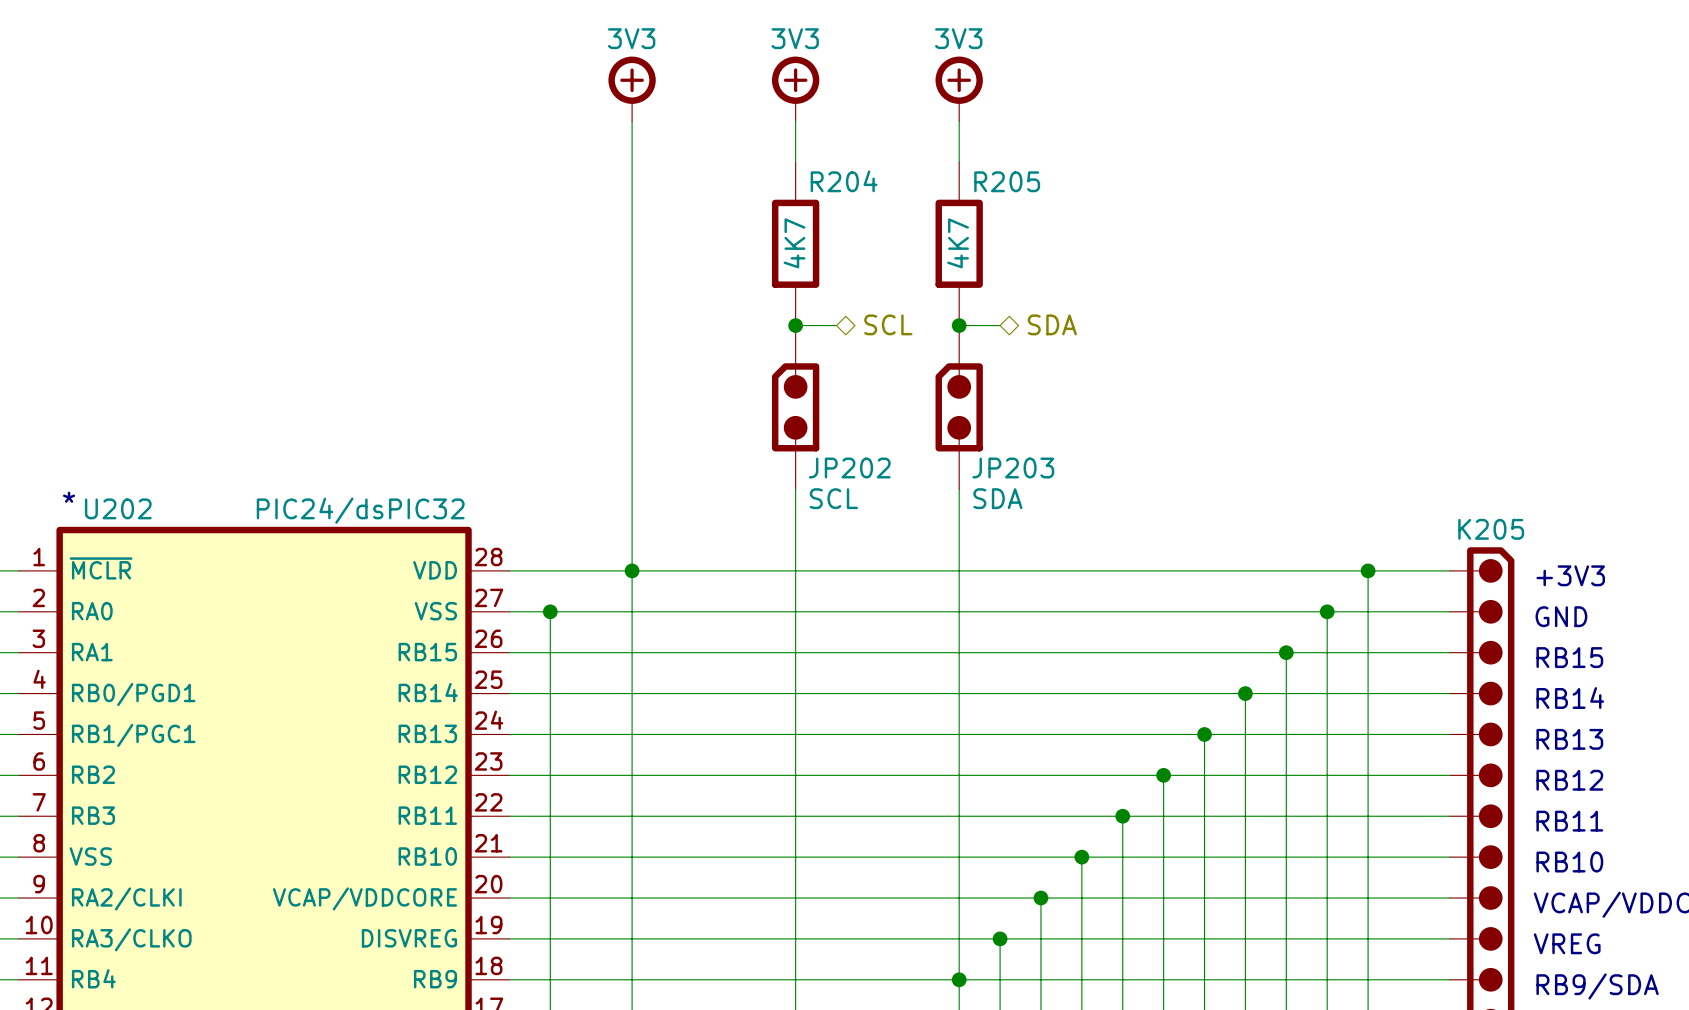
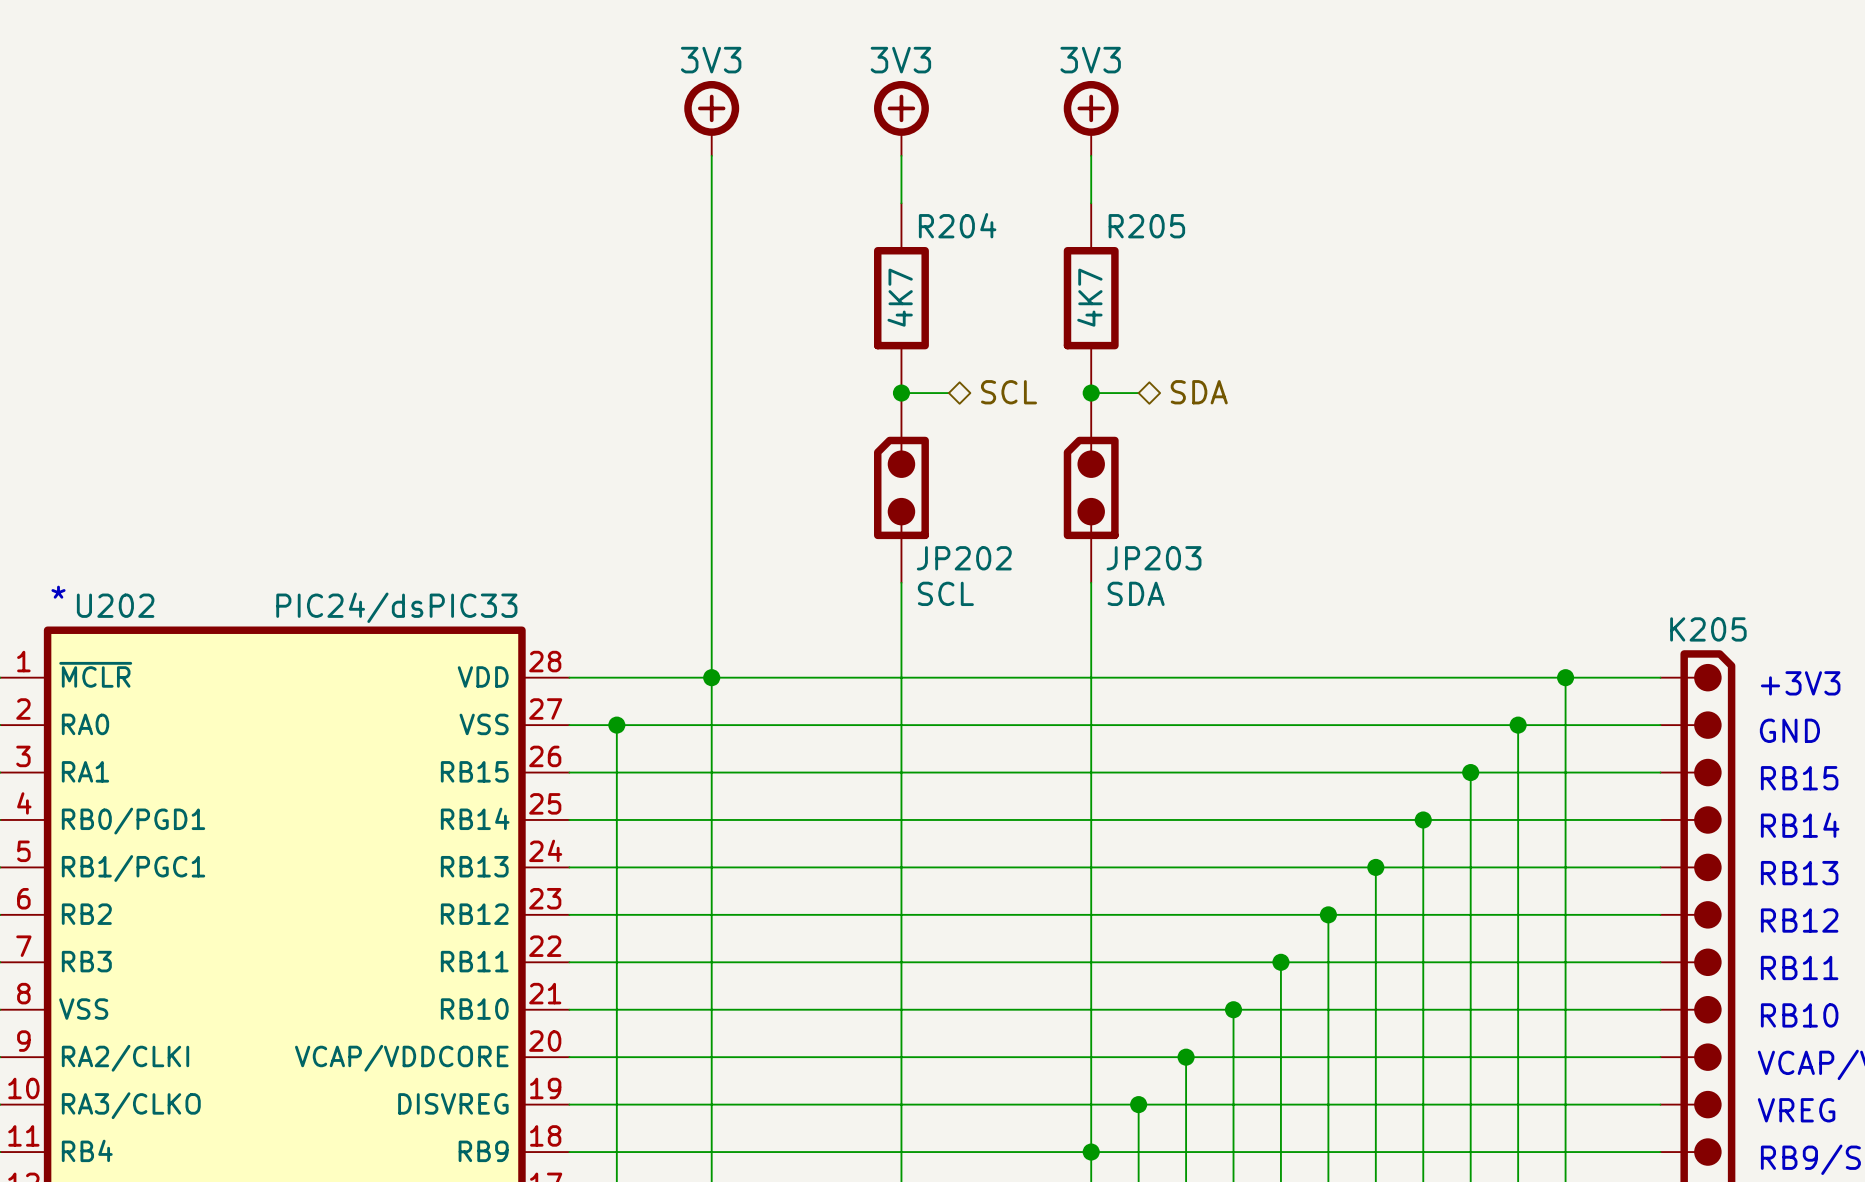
power symbol text: none -> 3V3 (711, 60)
power symbol text: 3V3 (631, 38) -> none
power symbol text: none -> 3V3 (900, 60)
power symbol text: 3V3 (795, 38) -> none
power symbol text: none -> 3V3 (1090, 60)
power symbol text: 3V3 (958, 38) -> none
U202 value: PIC24/dsPIC32 (360, 510) -> PIC24/dsPIC33 (396, 607)

